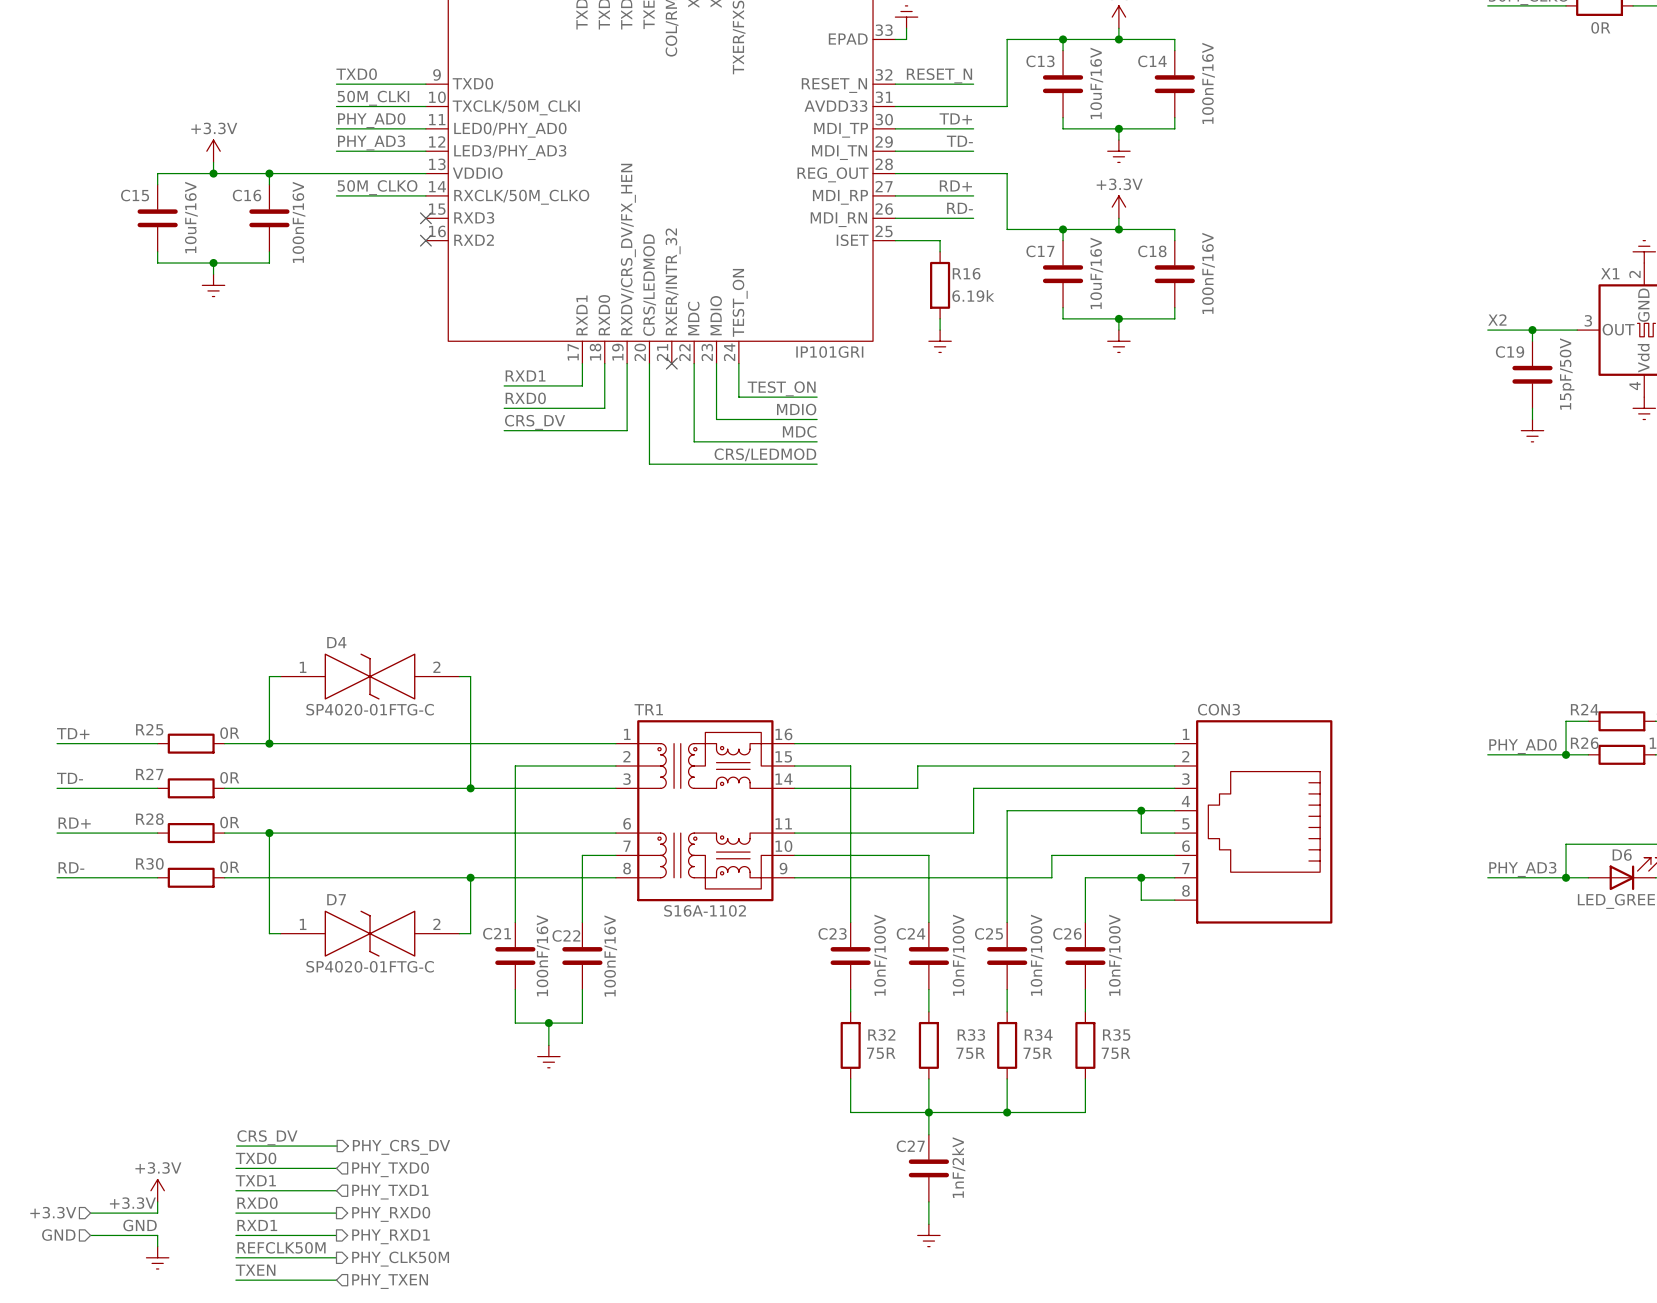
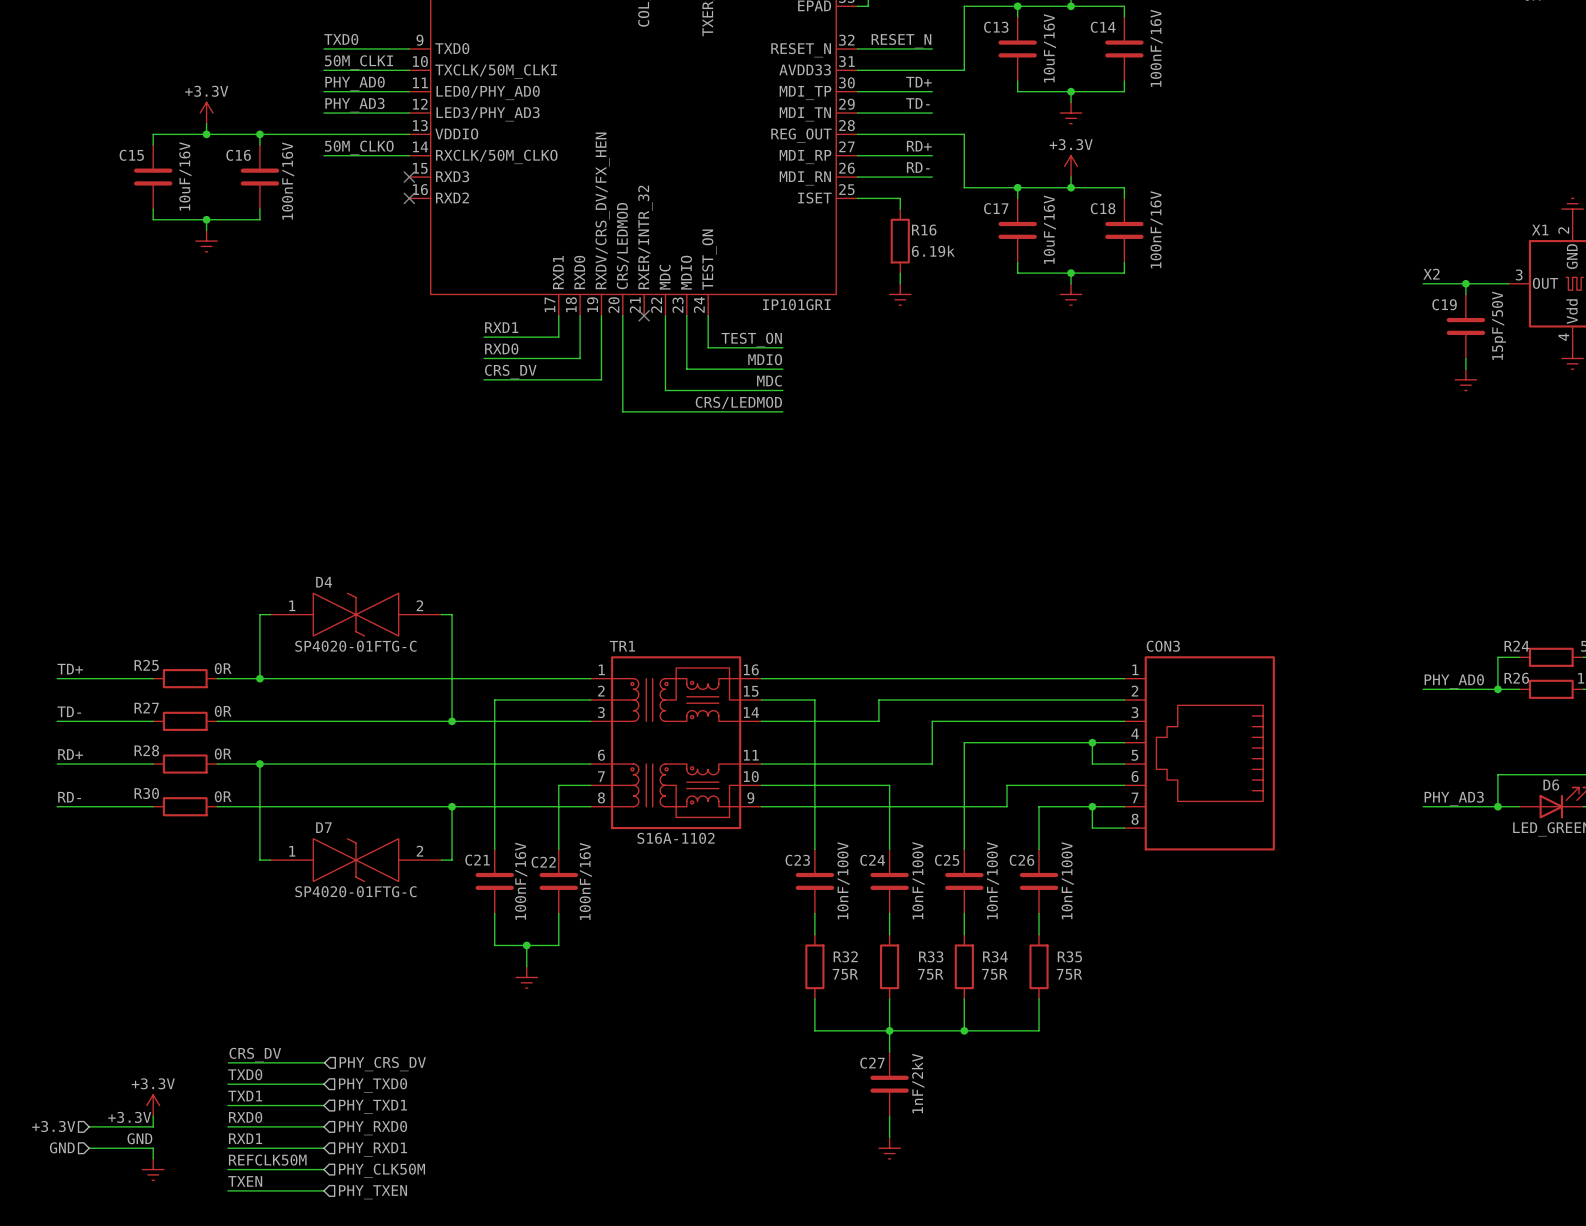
hierarchical label shape: output (401, 1147) -> input (382, 1064)
hierarchical label shape: output (391, 1214) -> input (373, 1128)
hierarchical label shape: output (390, 1236) -> input (372, 1149)
hierarchical label shape: output (400, 1259) -> input (381, 1170)

